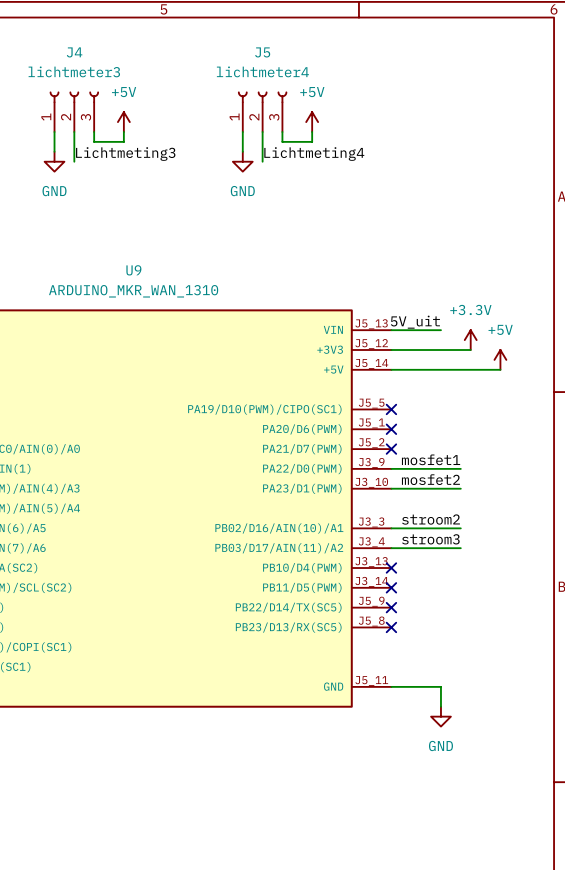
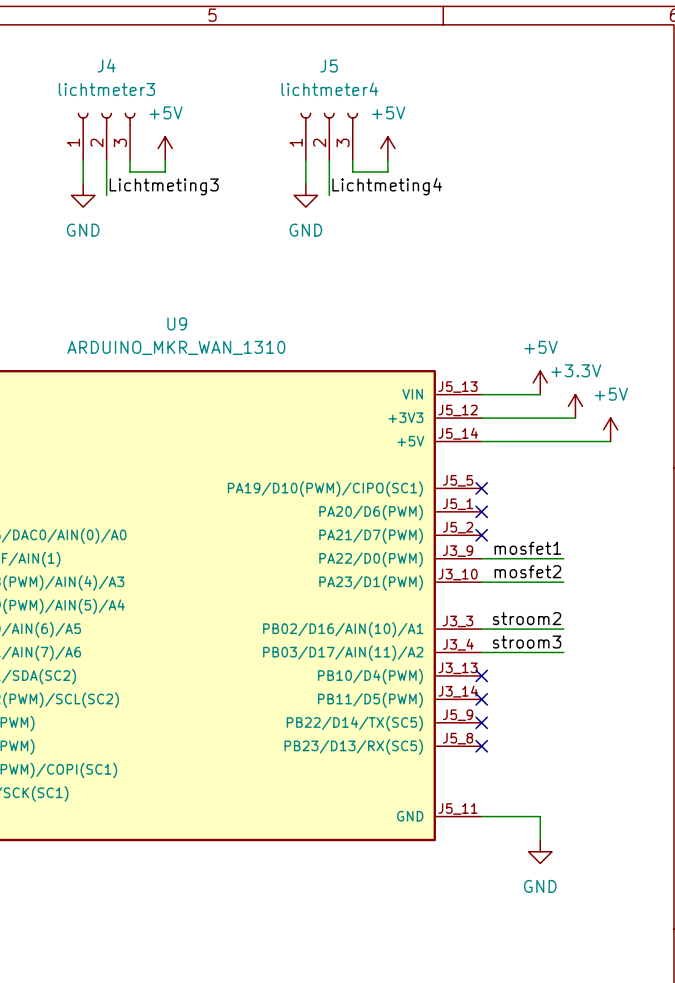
power symbol: none -> +5V (540, 382)
label: 5V_uit (415, 322) -> none

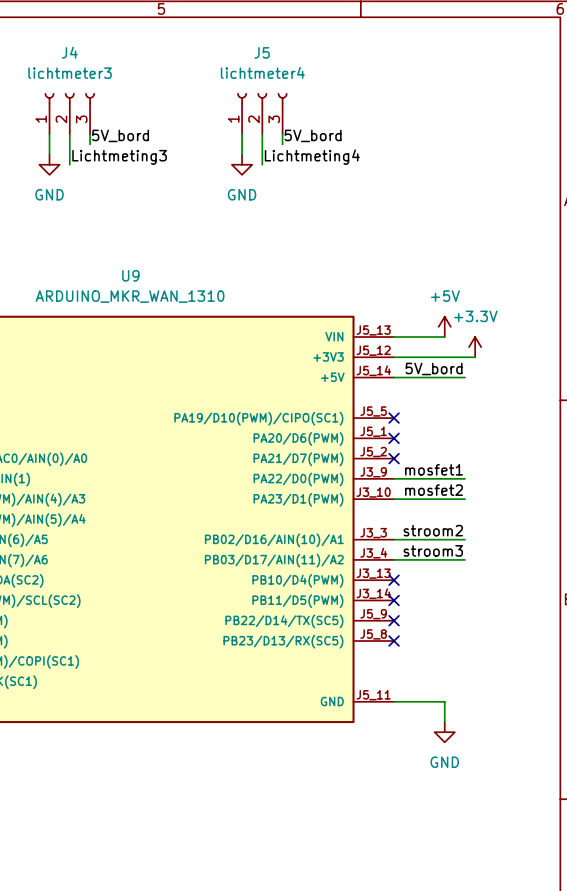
power symbol: +5V (165, 148) -> none
power symbol: +5V (387, 148) -> none
wire: (165, 160) (165, 171) (130, 171) -> none
wire: (387, 160) (387, 171) (352, 171) -> none
label: none -> 5V_bord (120, 135)
label: none -> 5V_bord (313, 135)
power symbol: +5V (610, 429) -> none
label: none -> 5V_bord (434, 368)
wire: (563, 441) (610, 441) -> none

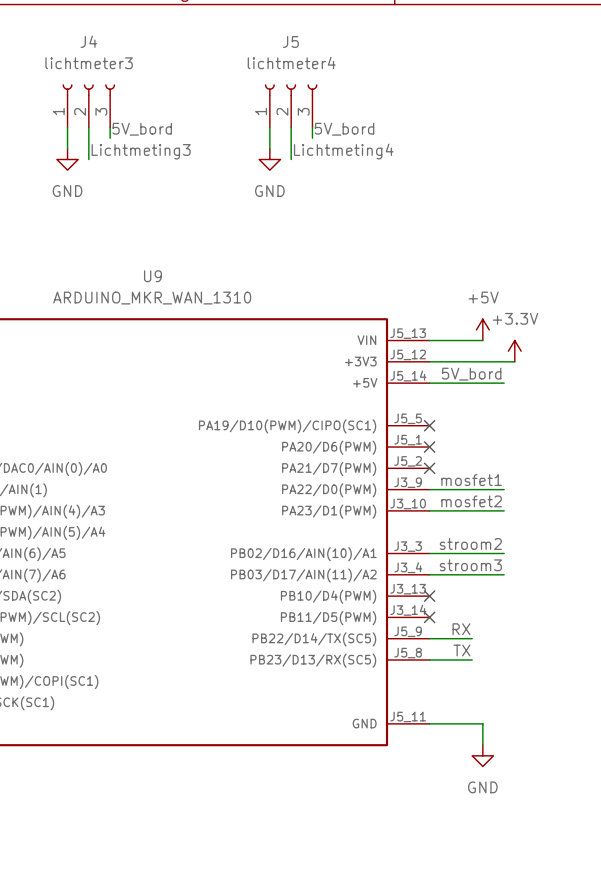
label: none -> RX (461, 629)
wire: none -> (429, 638) (472, 638)
no-connect mark: (394, 620) -> none
label: none -> TX (461, 650)
wire: none -> (429, 659) (472, 659)
no-connect mark: (394, 641) -> none

